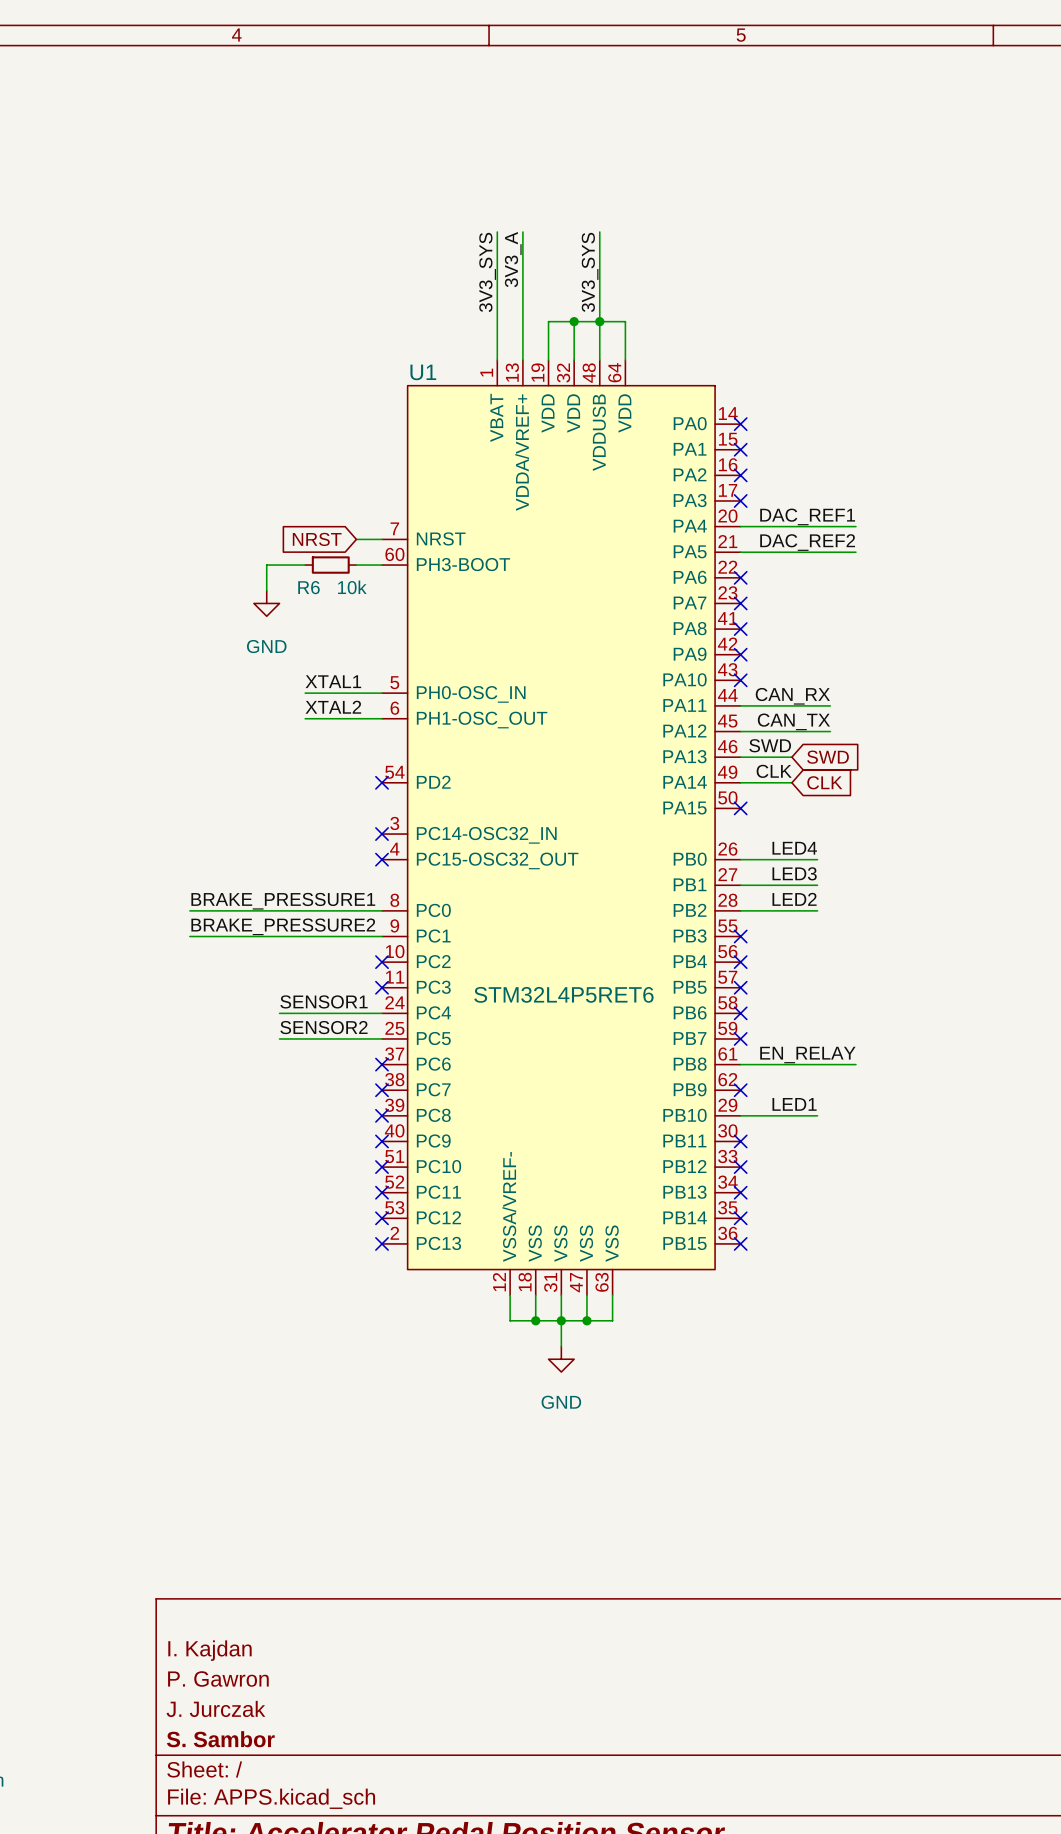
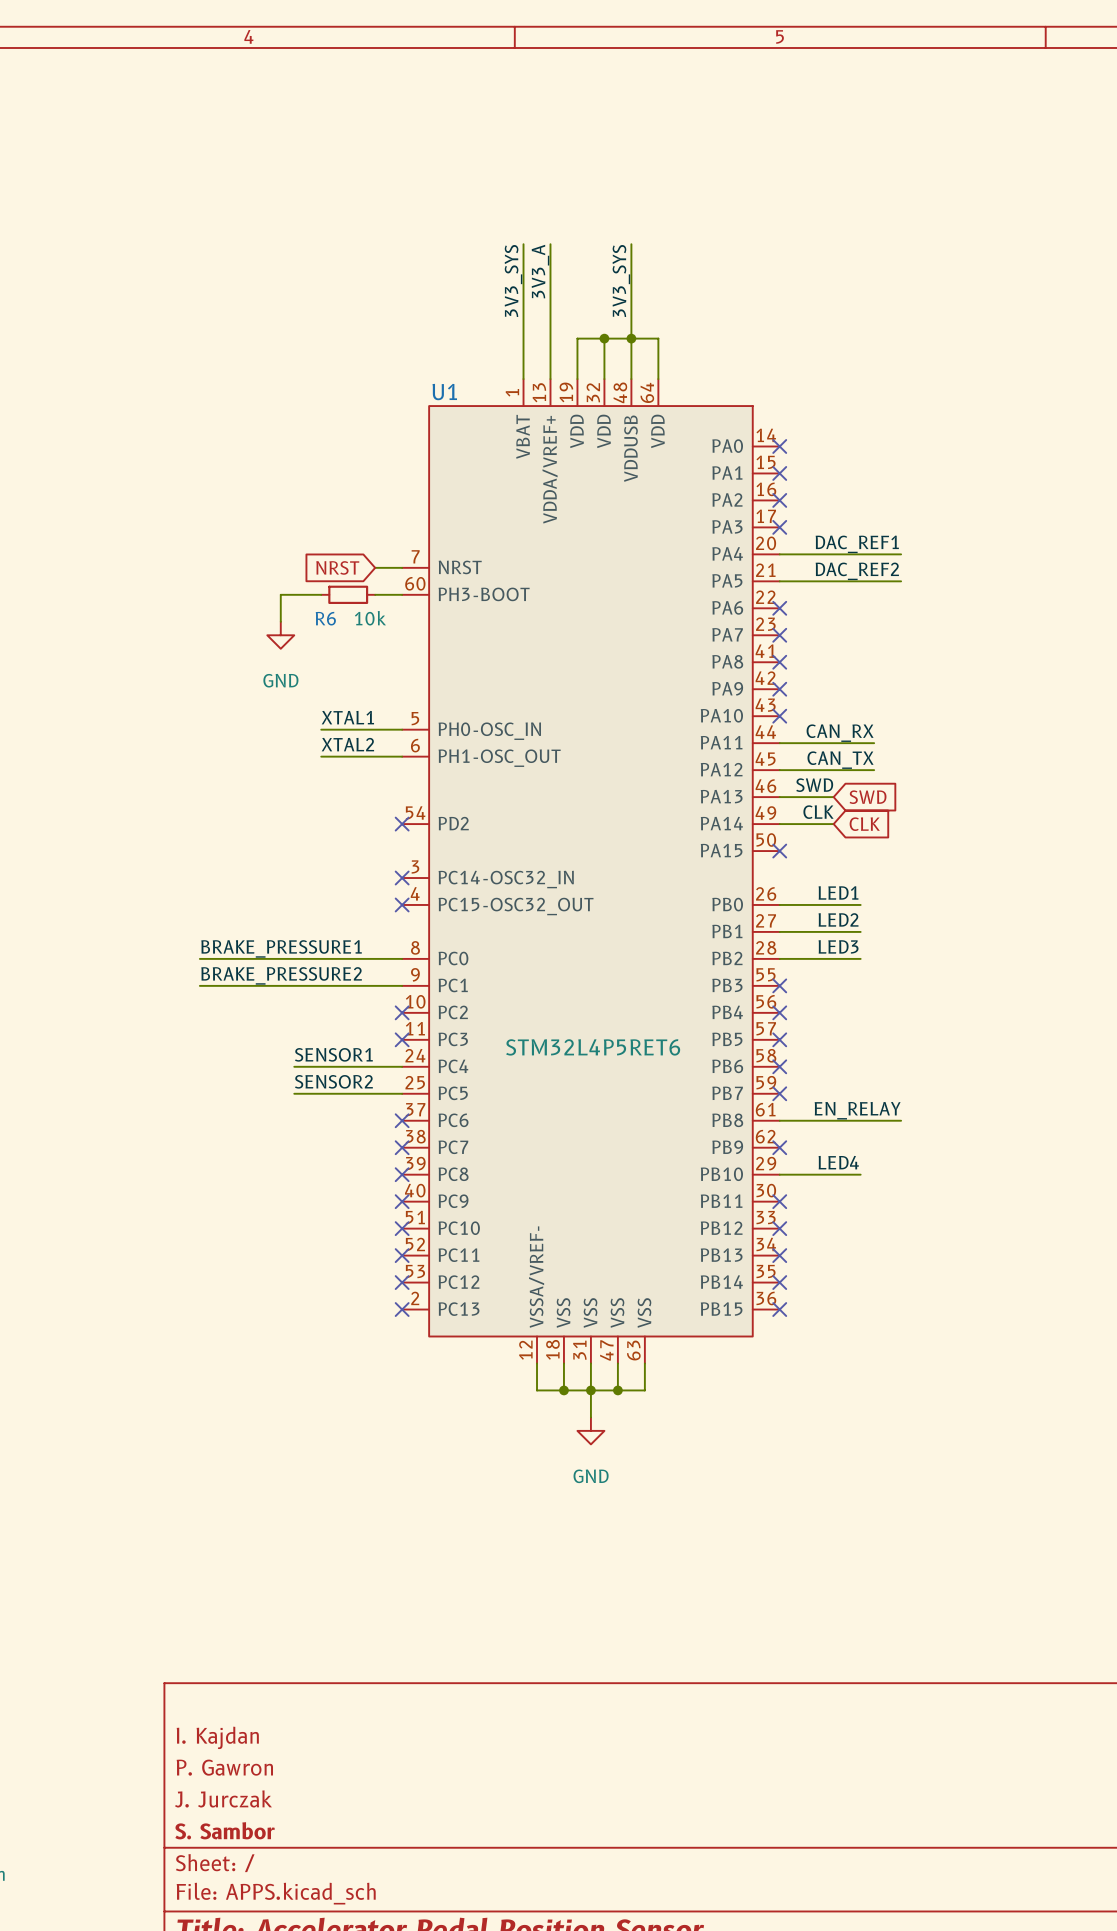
label: LED4 (794, 848) -> LED1 (838, 892)
label: LED3 (794, 873) -> LED2 (838, 919)
label: LED2 (794, 899) -> LED3 (838, 946)
label: LED1 (794, 1104) -> LED4 (838, 1162)

